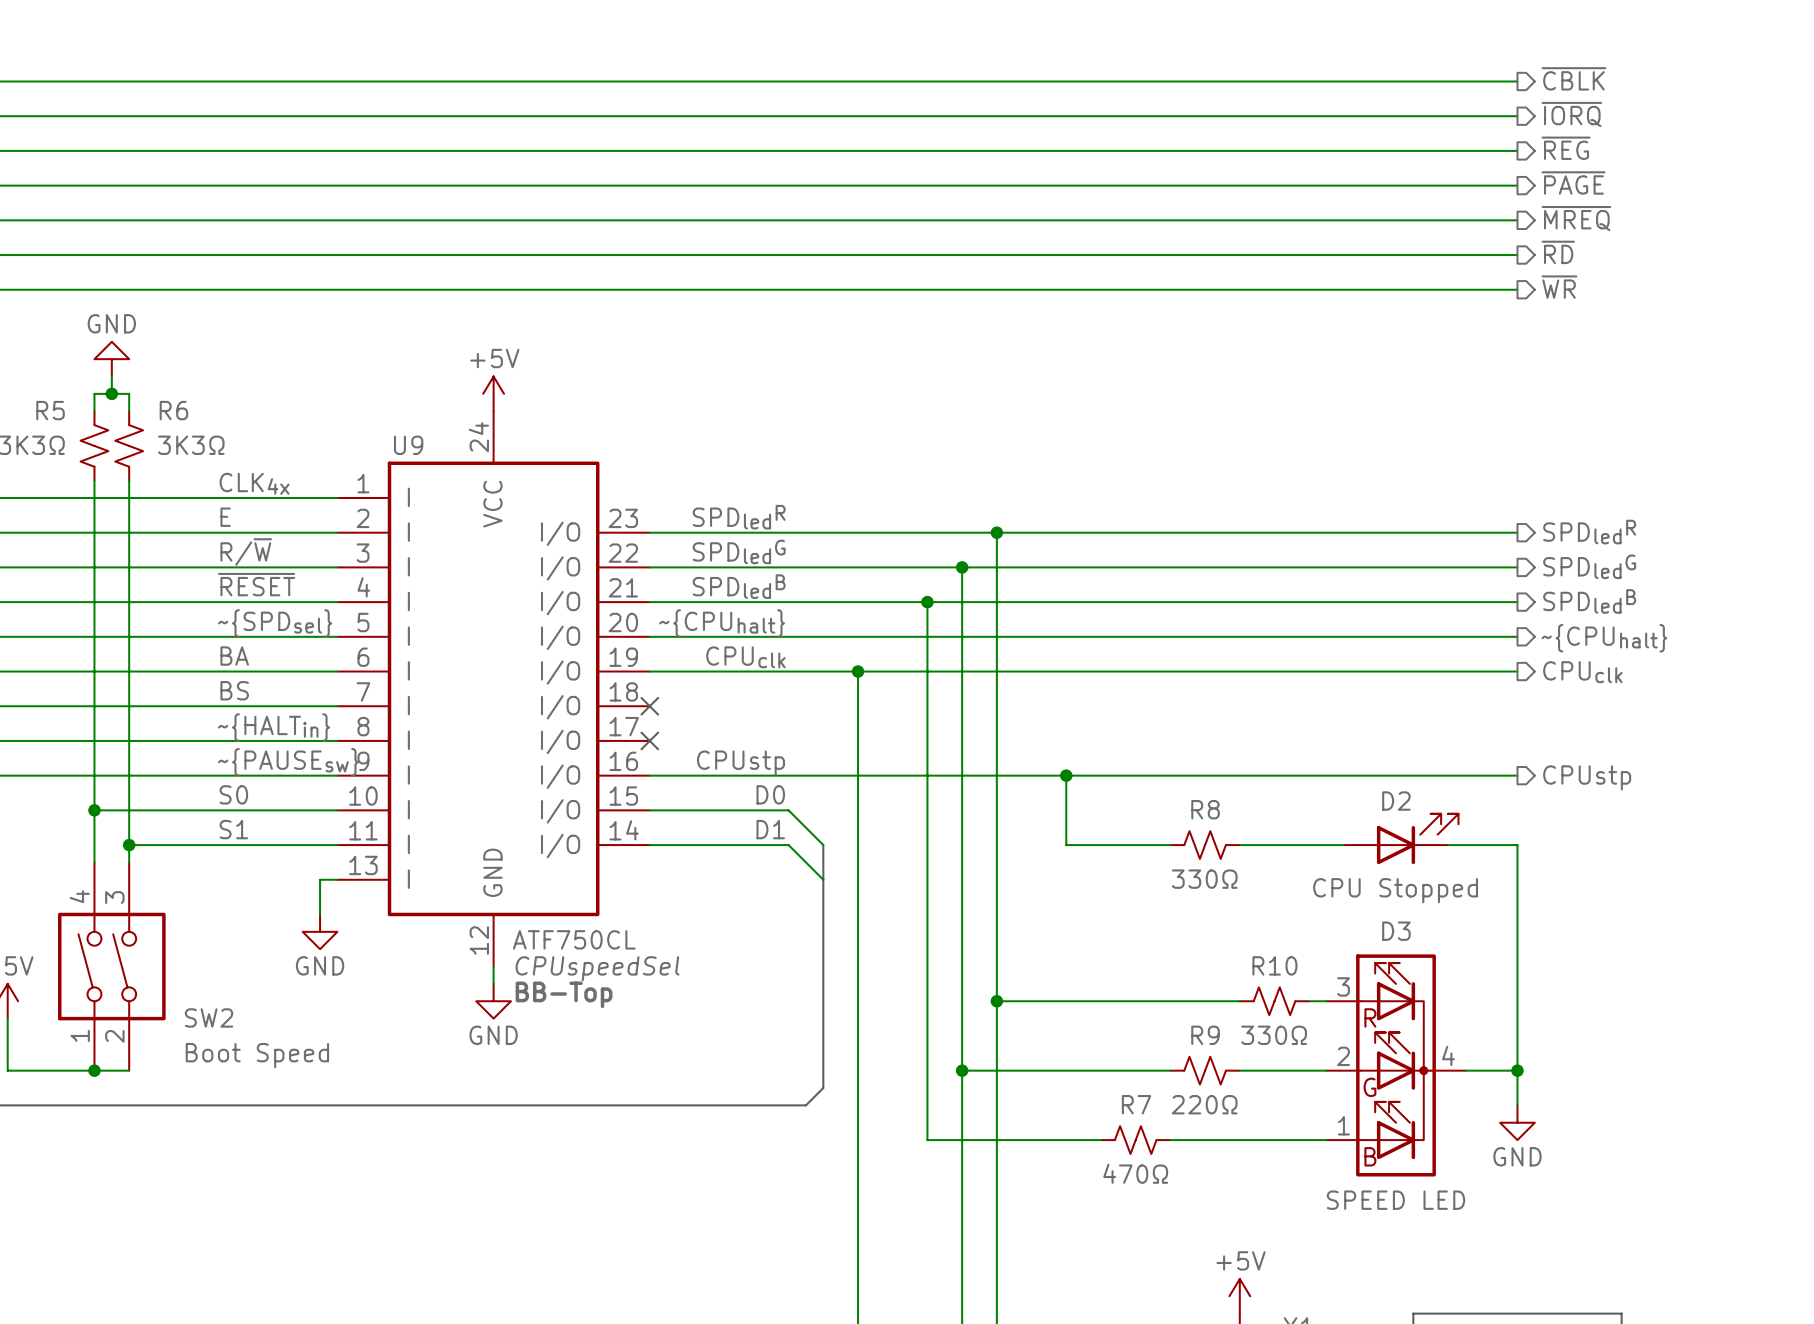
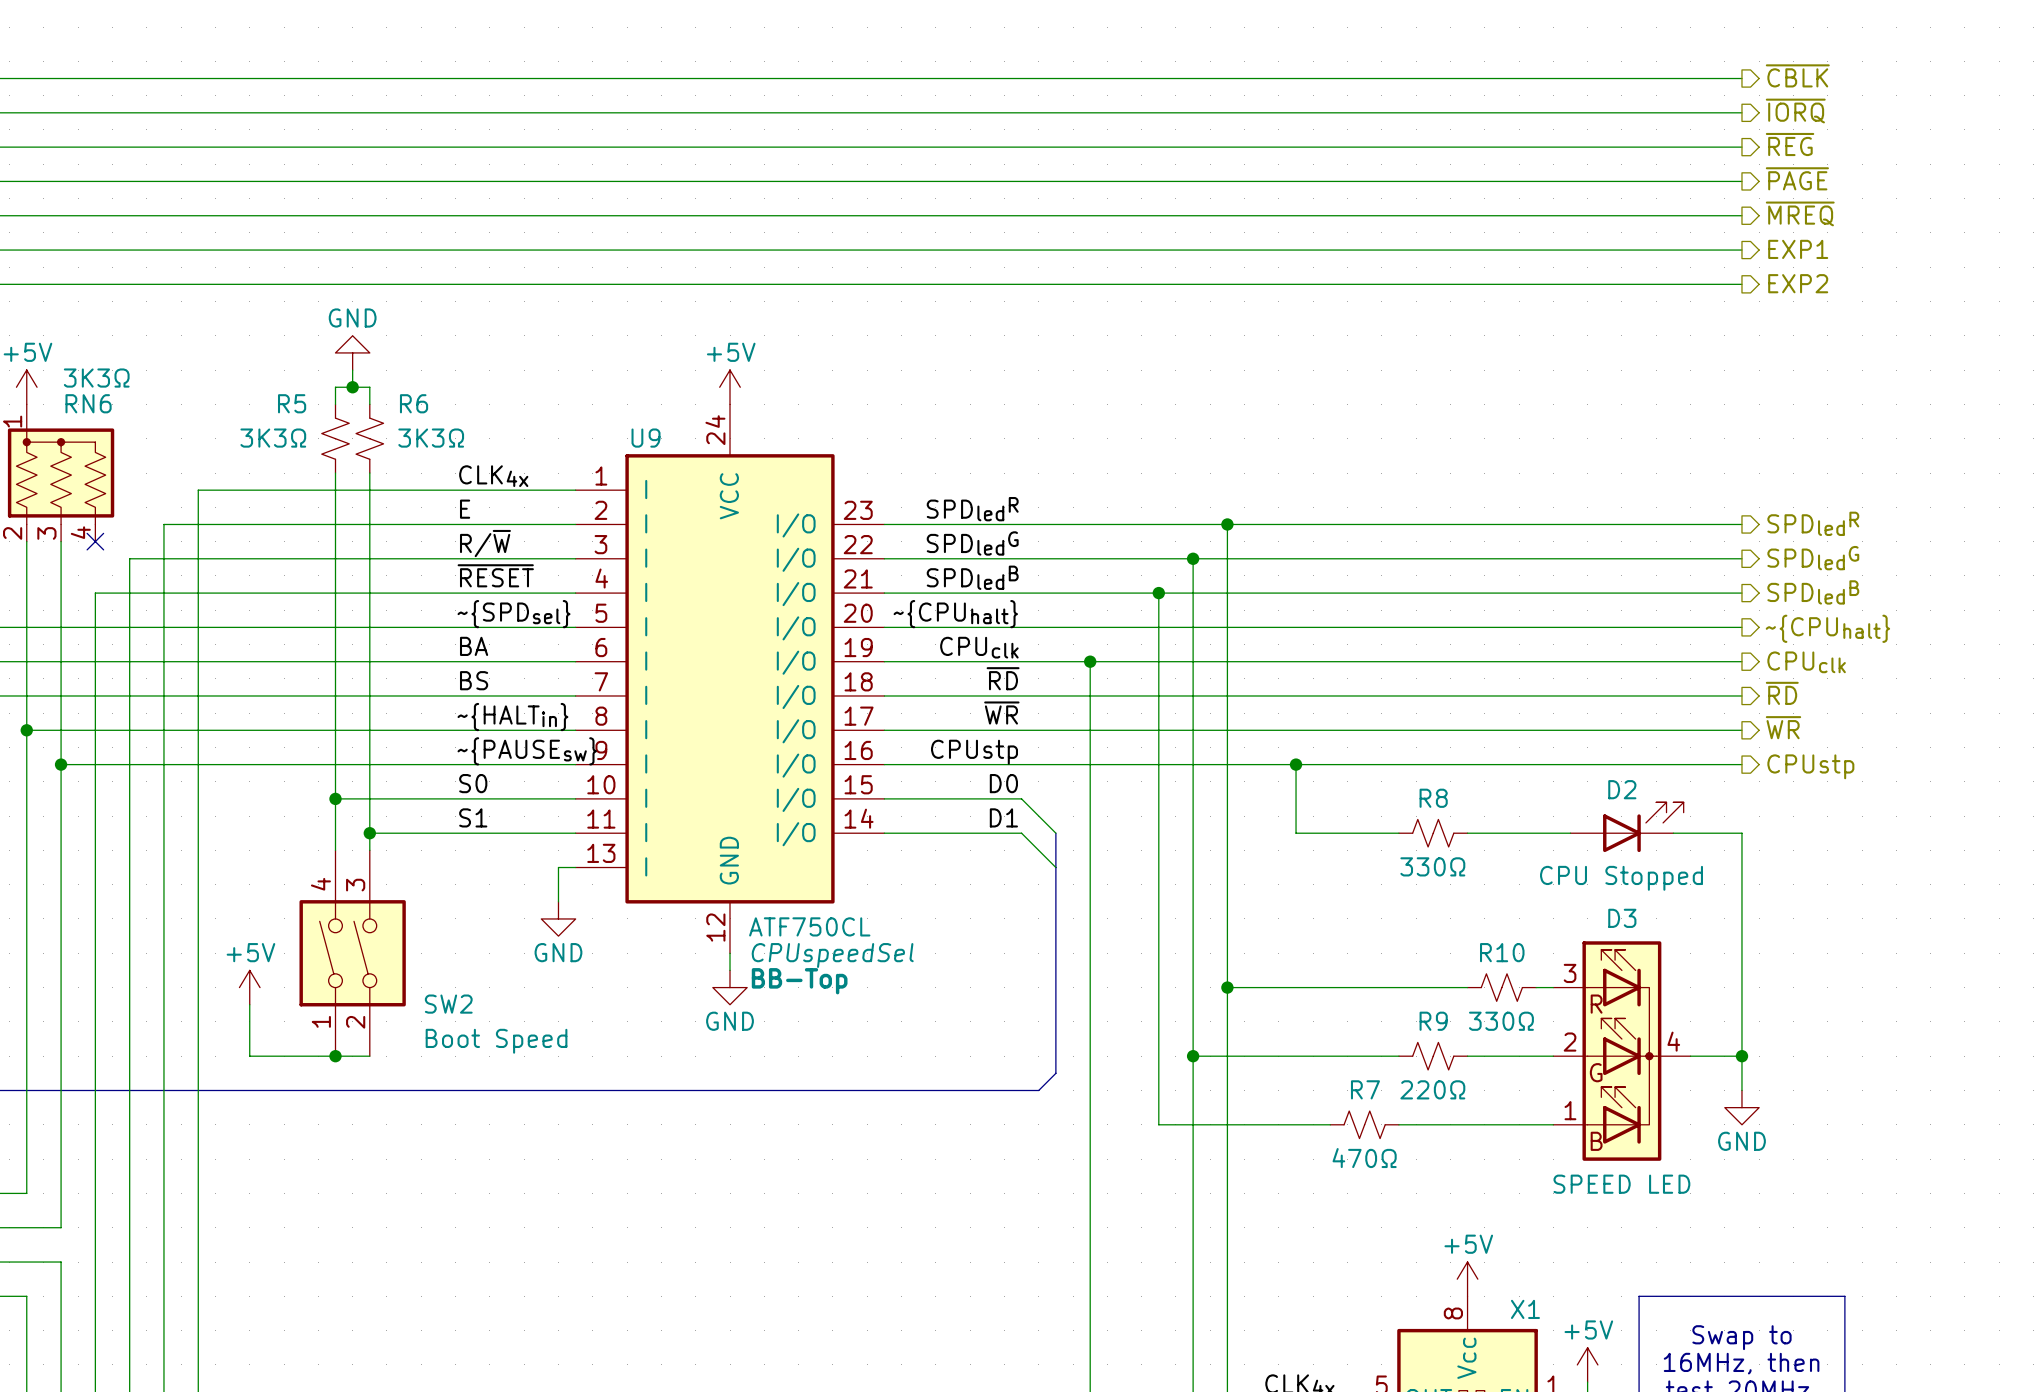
hierarchical label: ~{RD} (1558, 252) -> EXP1 (1798, 249)
hierarchical label: ~{WR} (1559, 287) -> EXP2 (1798, 283)
label: none -> ~{RD} (1003, 678)
hierarchical label: none -> ~{RD} (1782, 693)
wire: none -> (884, 695) (1741, 695)
no-connect mark: (649, 706) -> none
label: none -> ~{WR} (1001, 713)
hierarchical label: none -> ~{WR} (1783, 727)
wire: none -> (884, 730) (1741, 730)
no-connect mark: (649, 740) -> none

